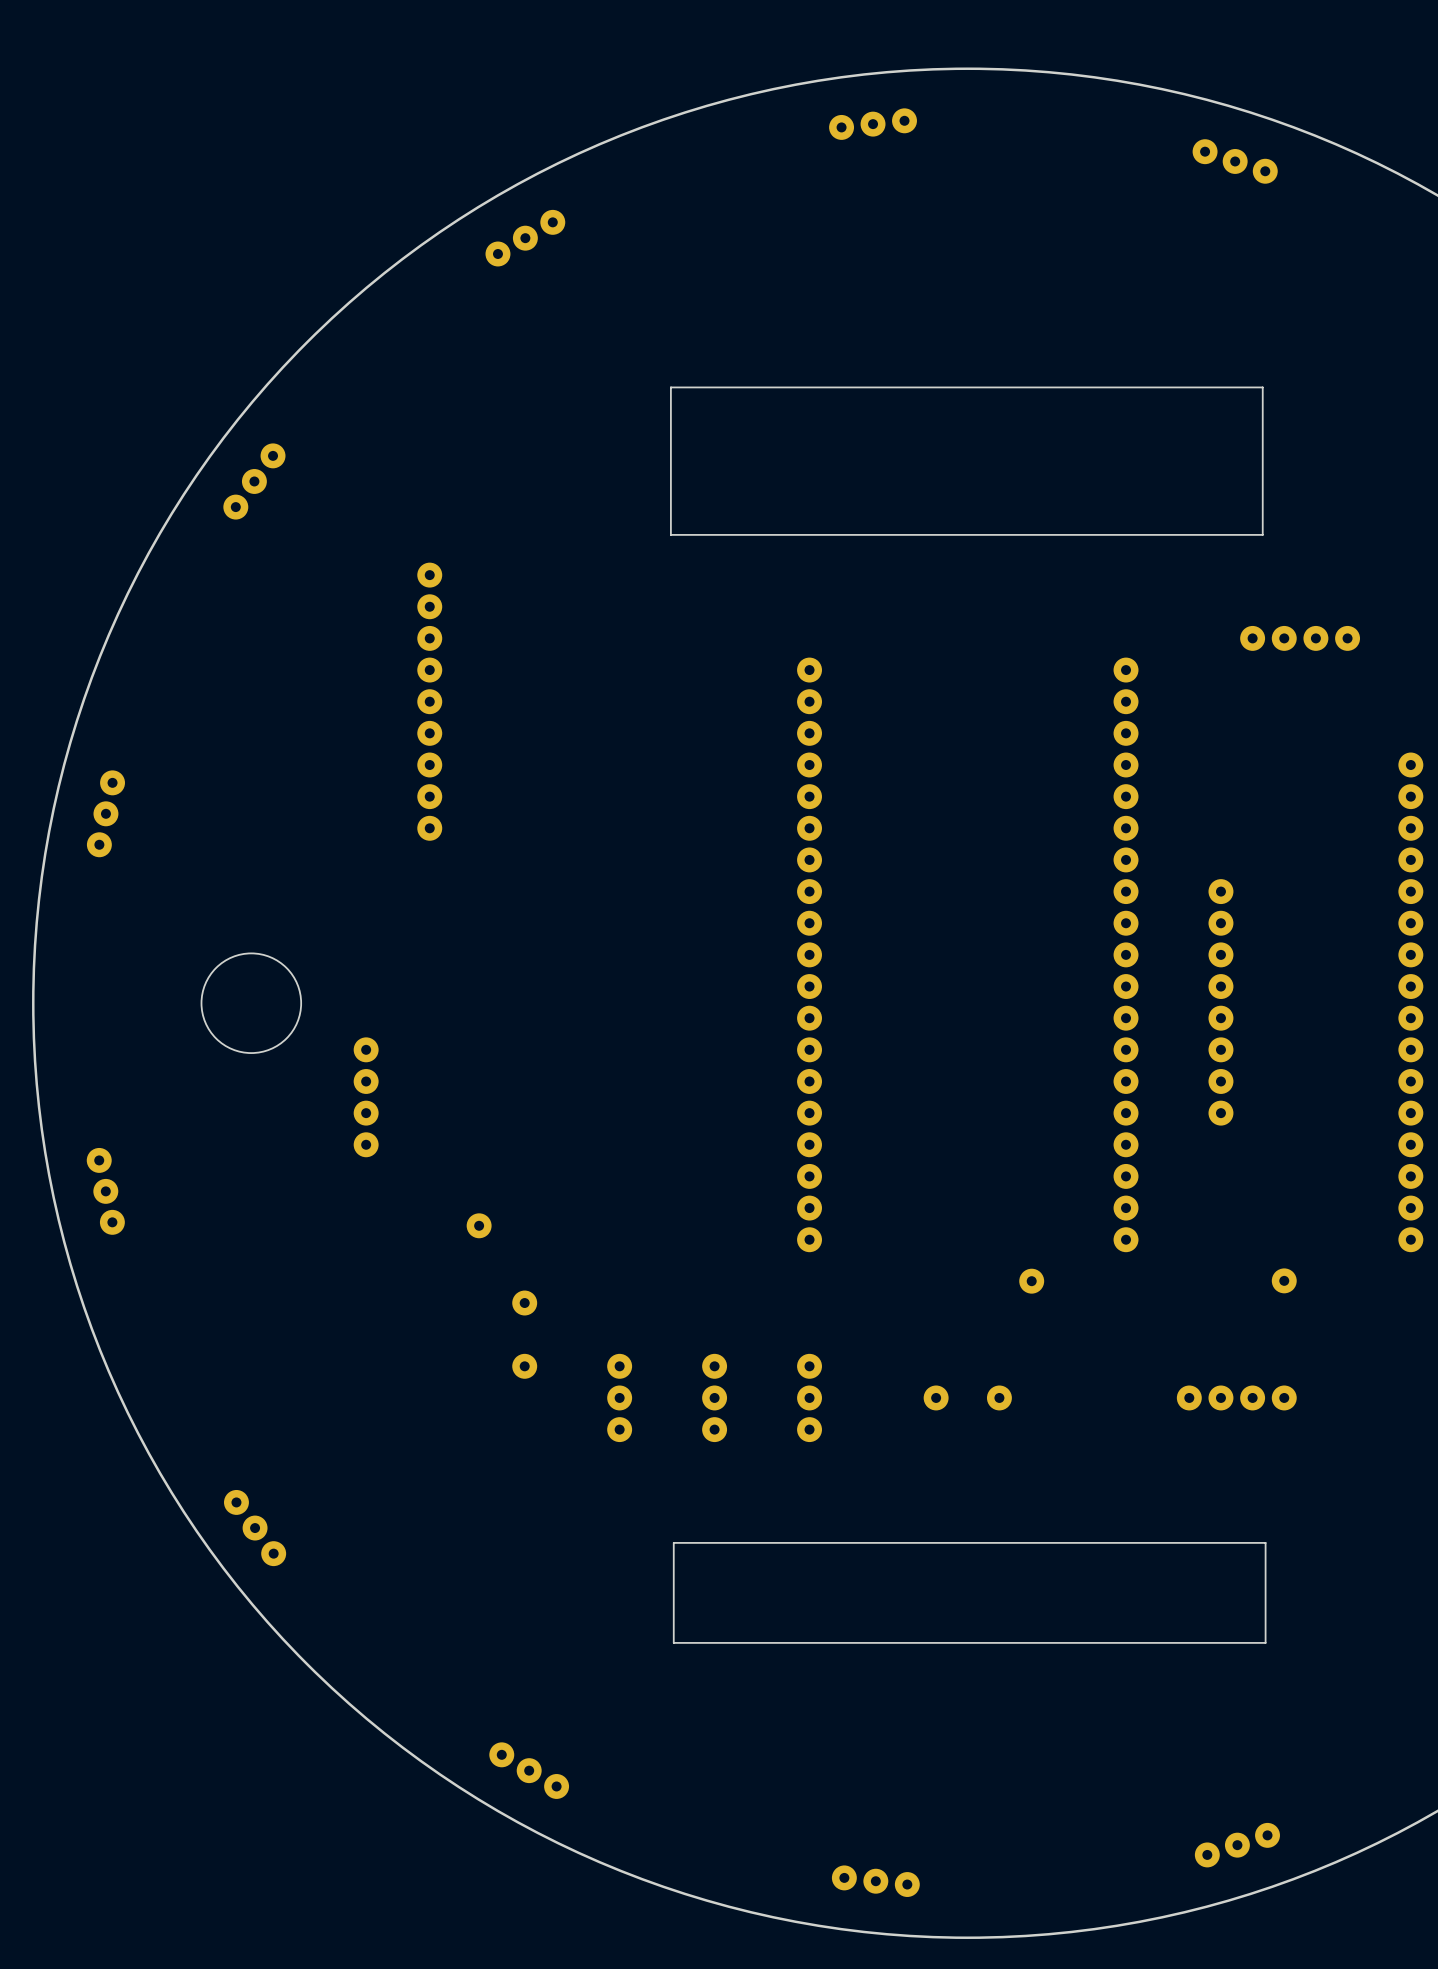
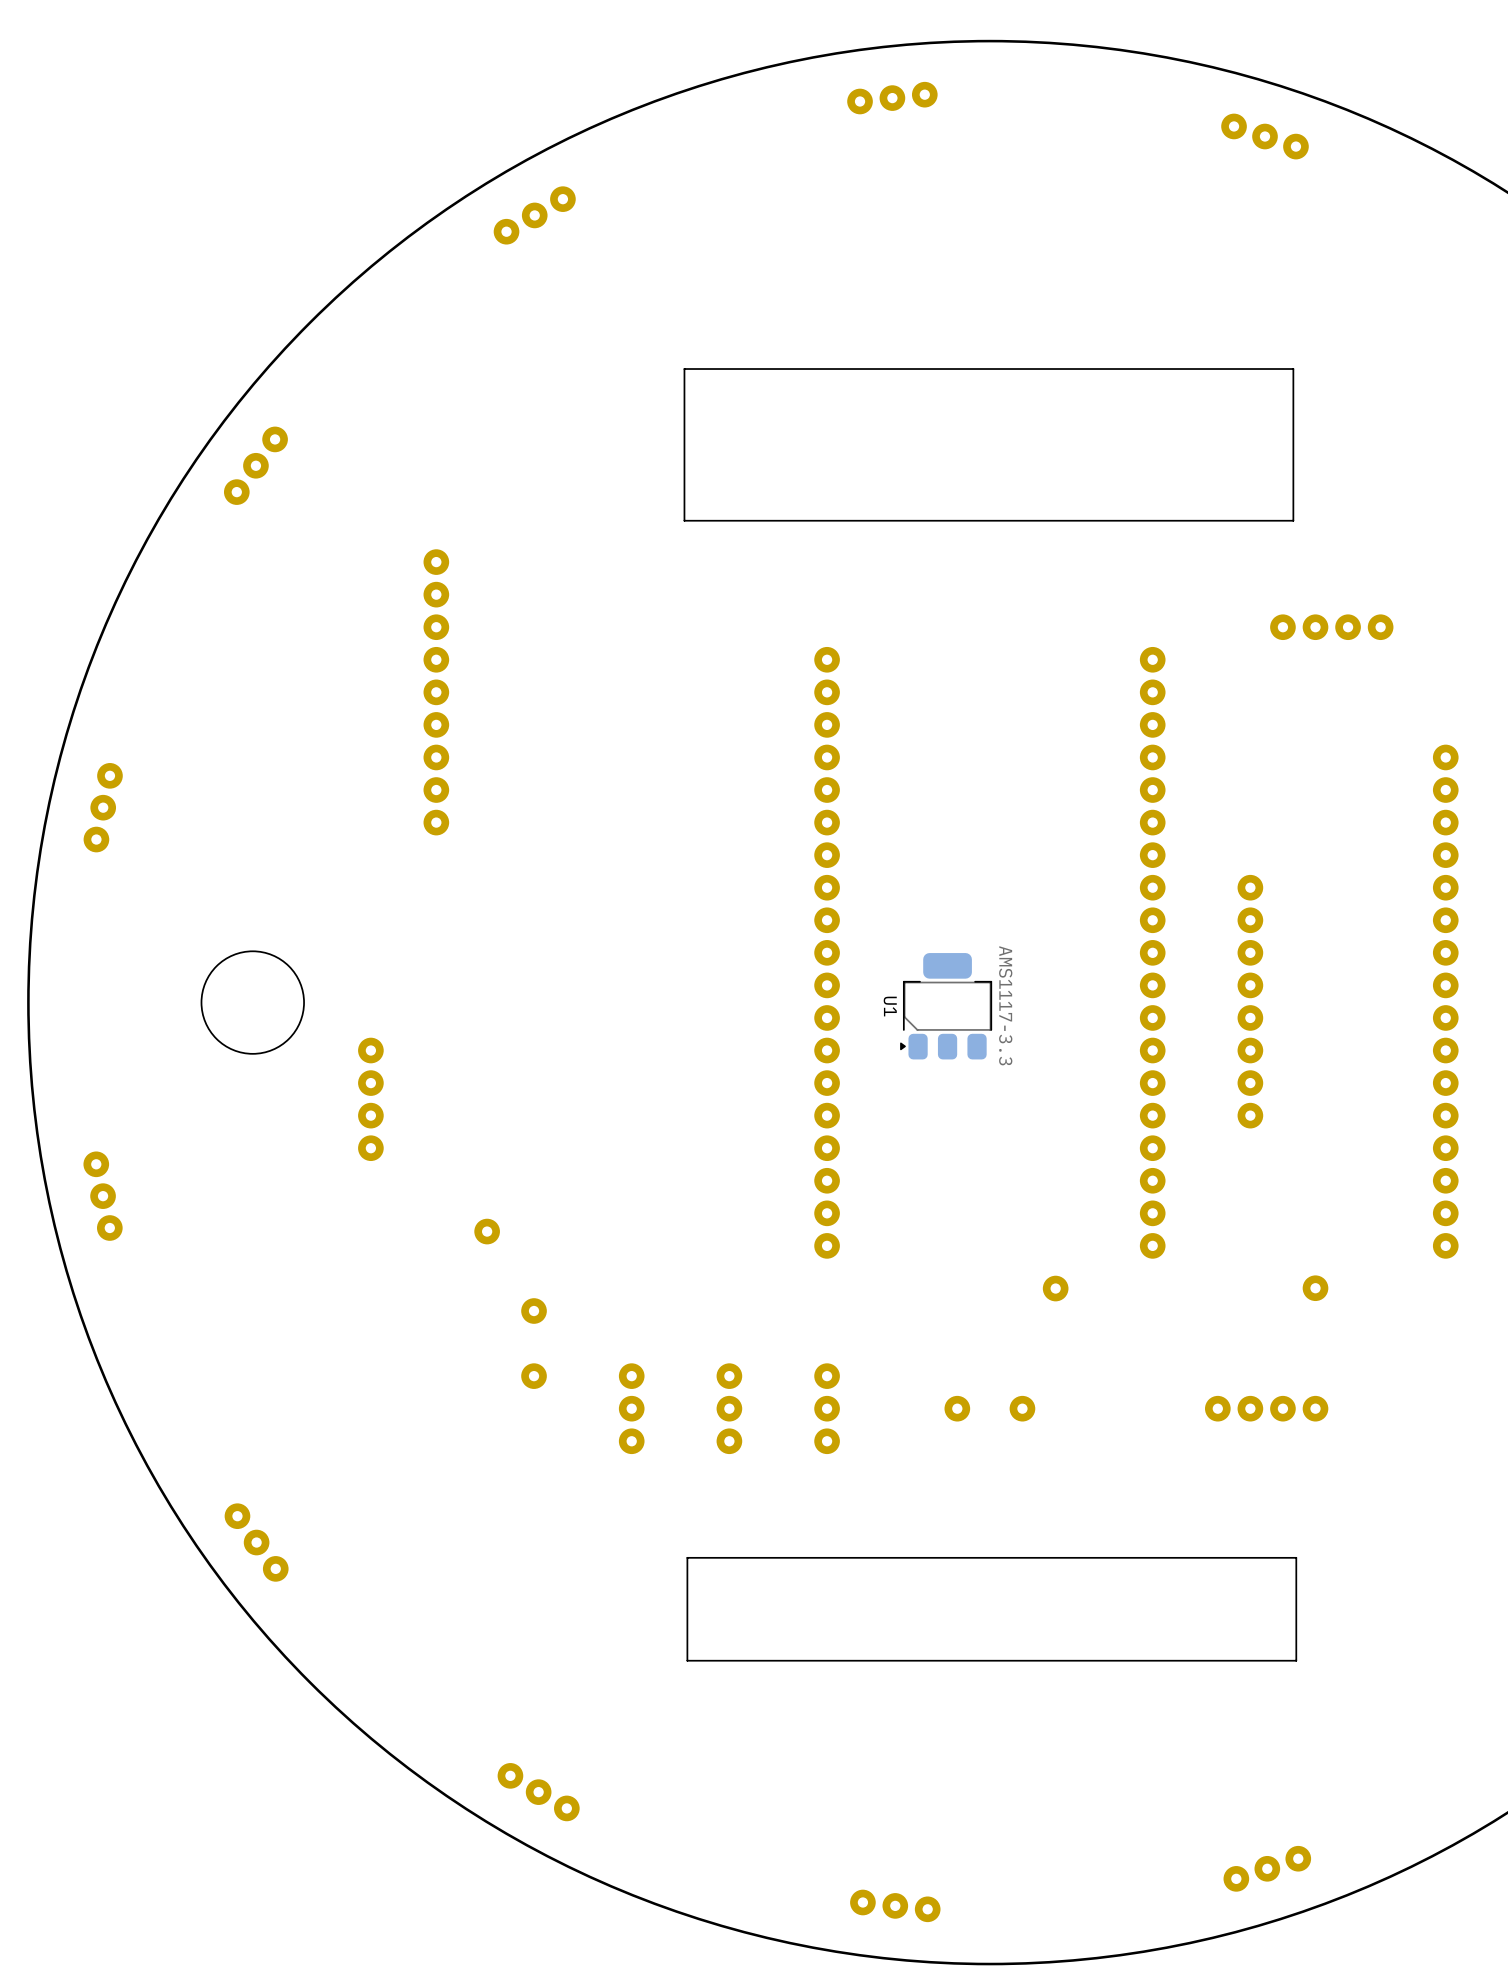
U1: none -> AMS1117-3.3 (946, 1006)

